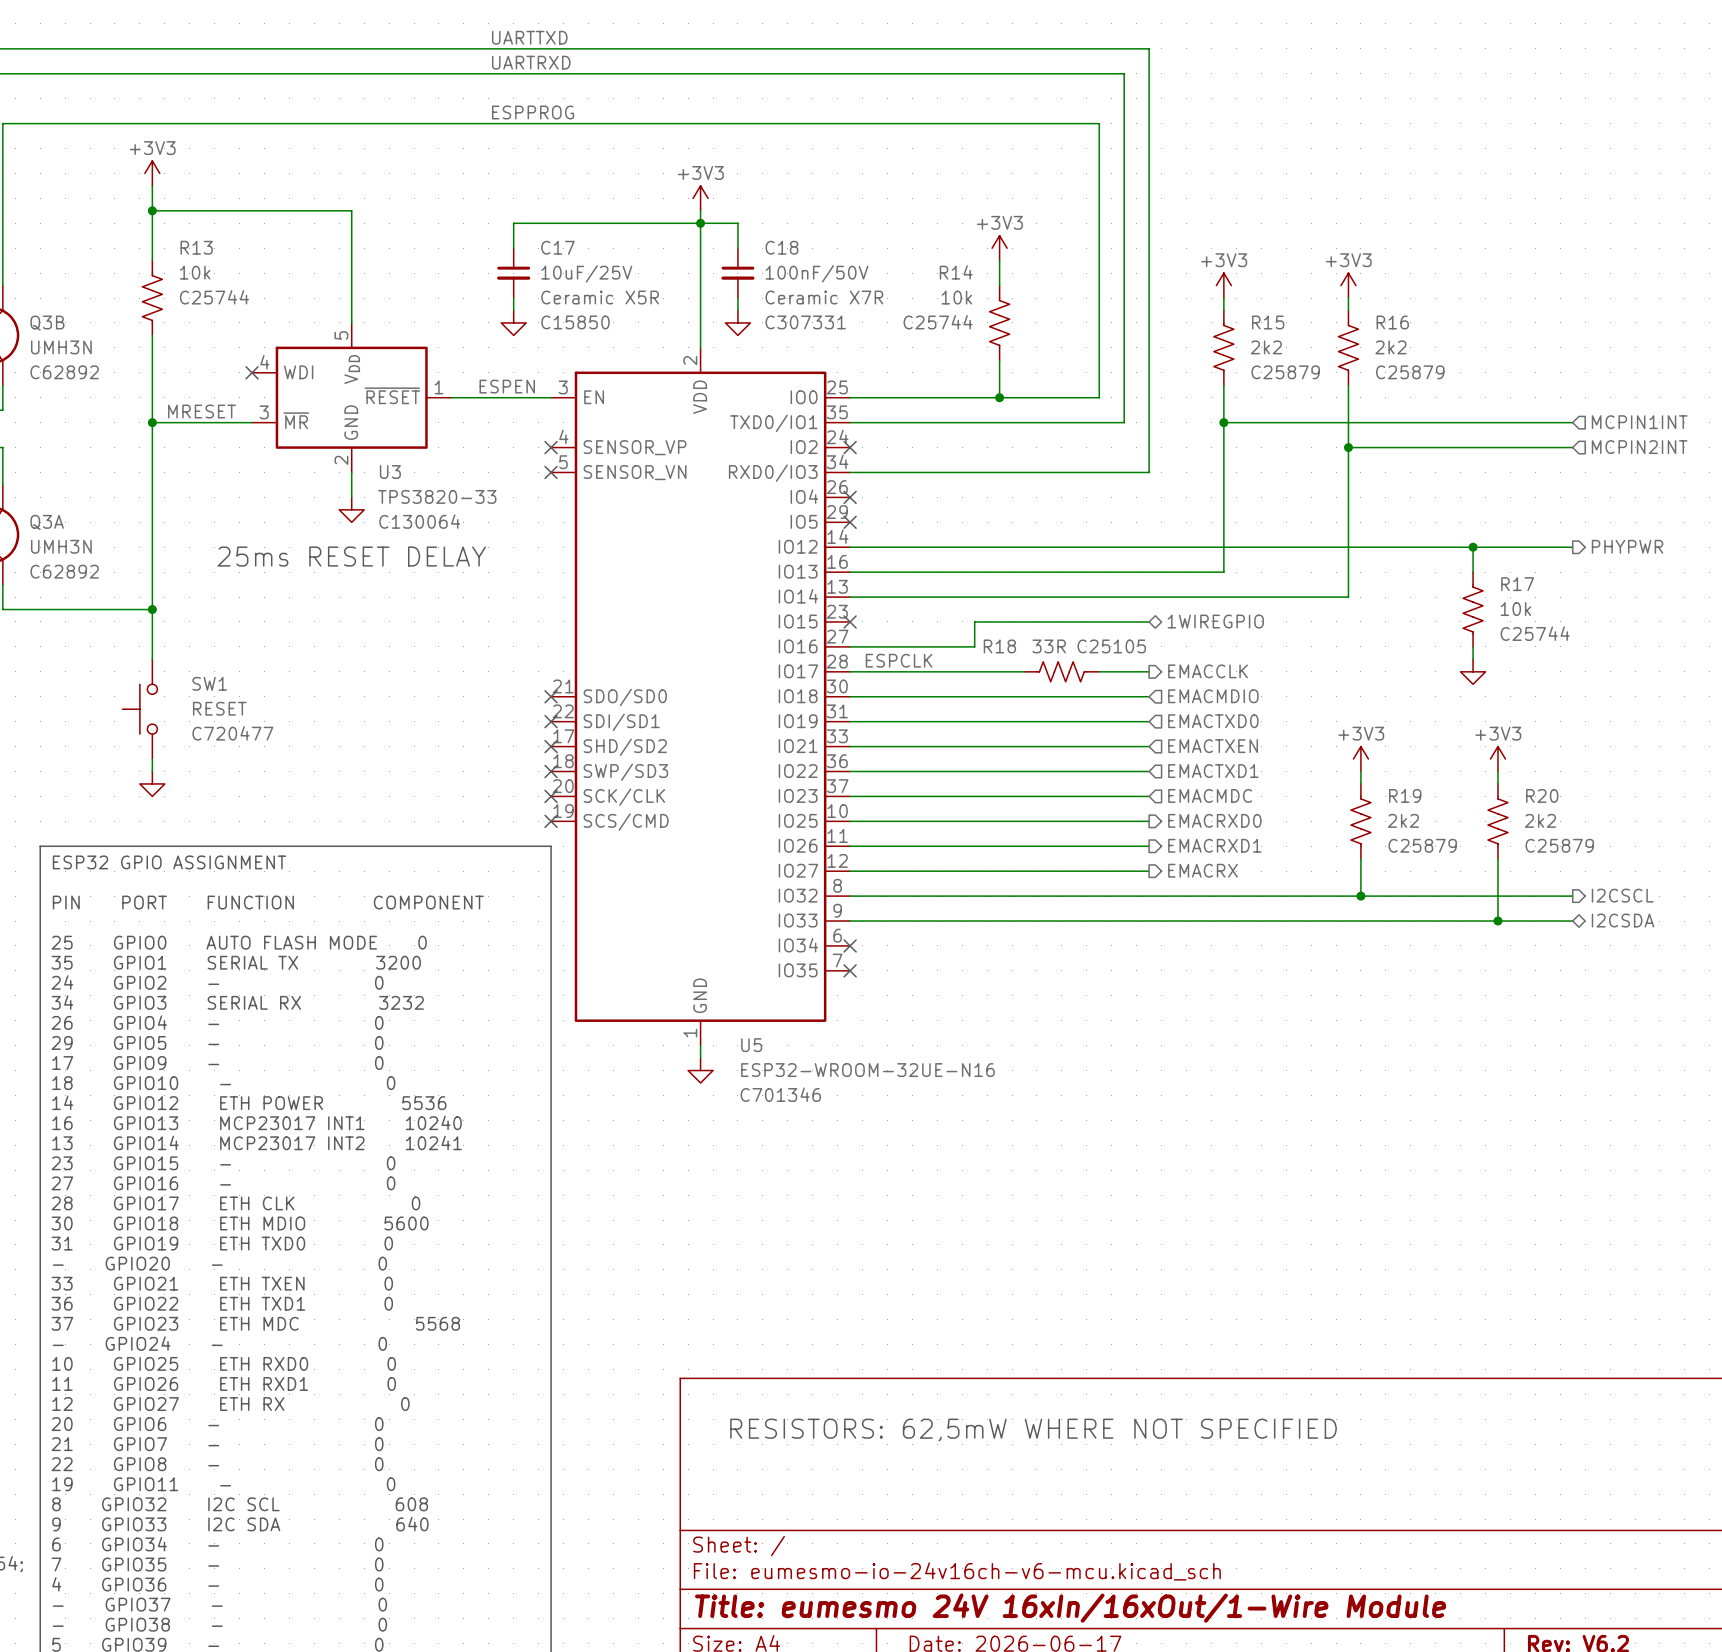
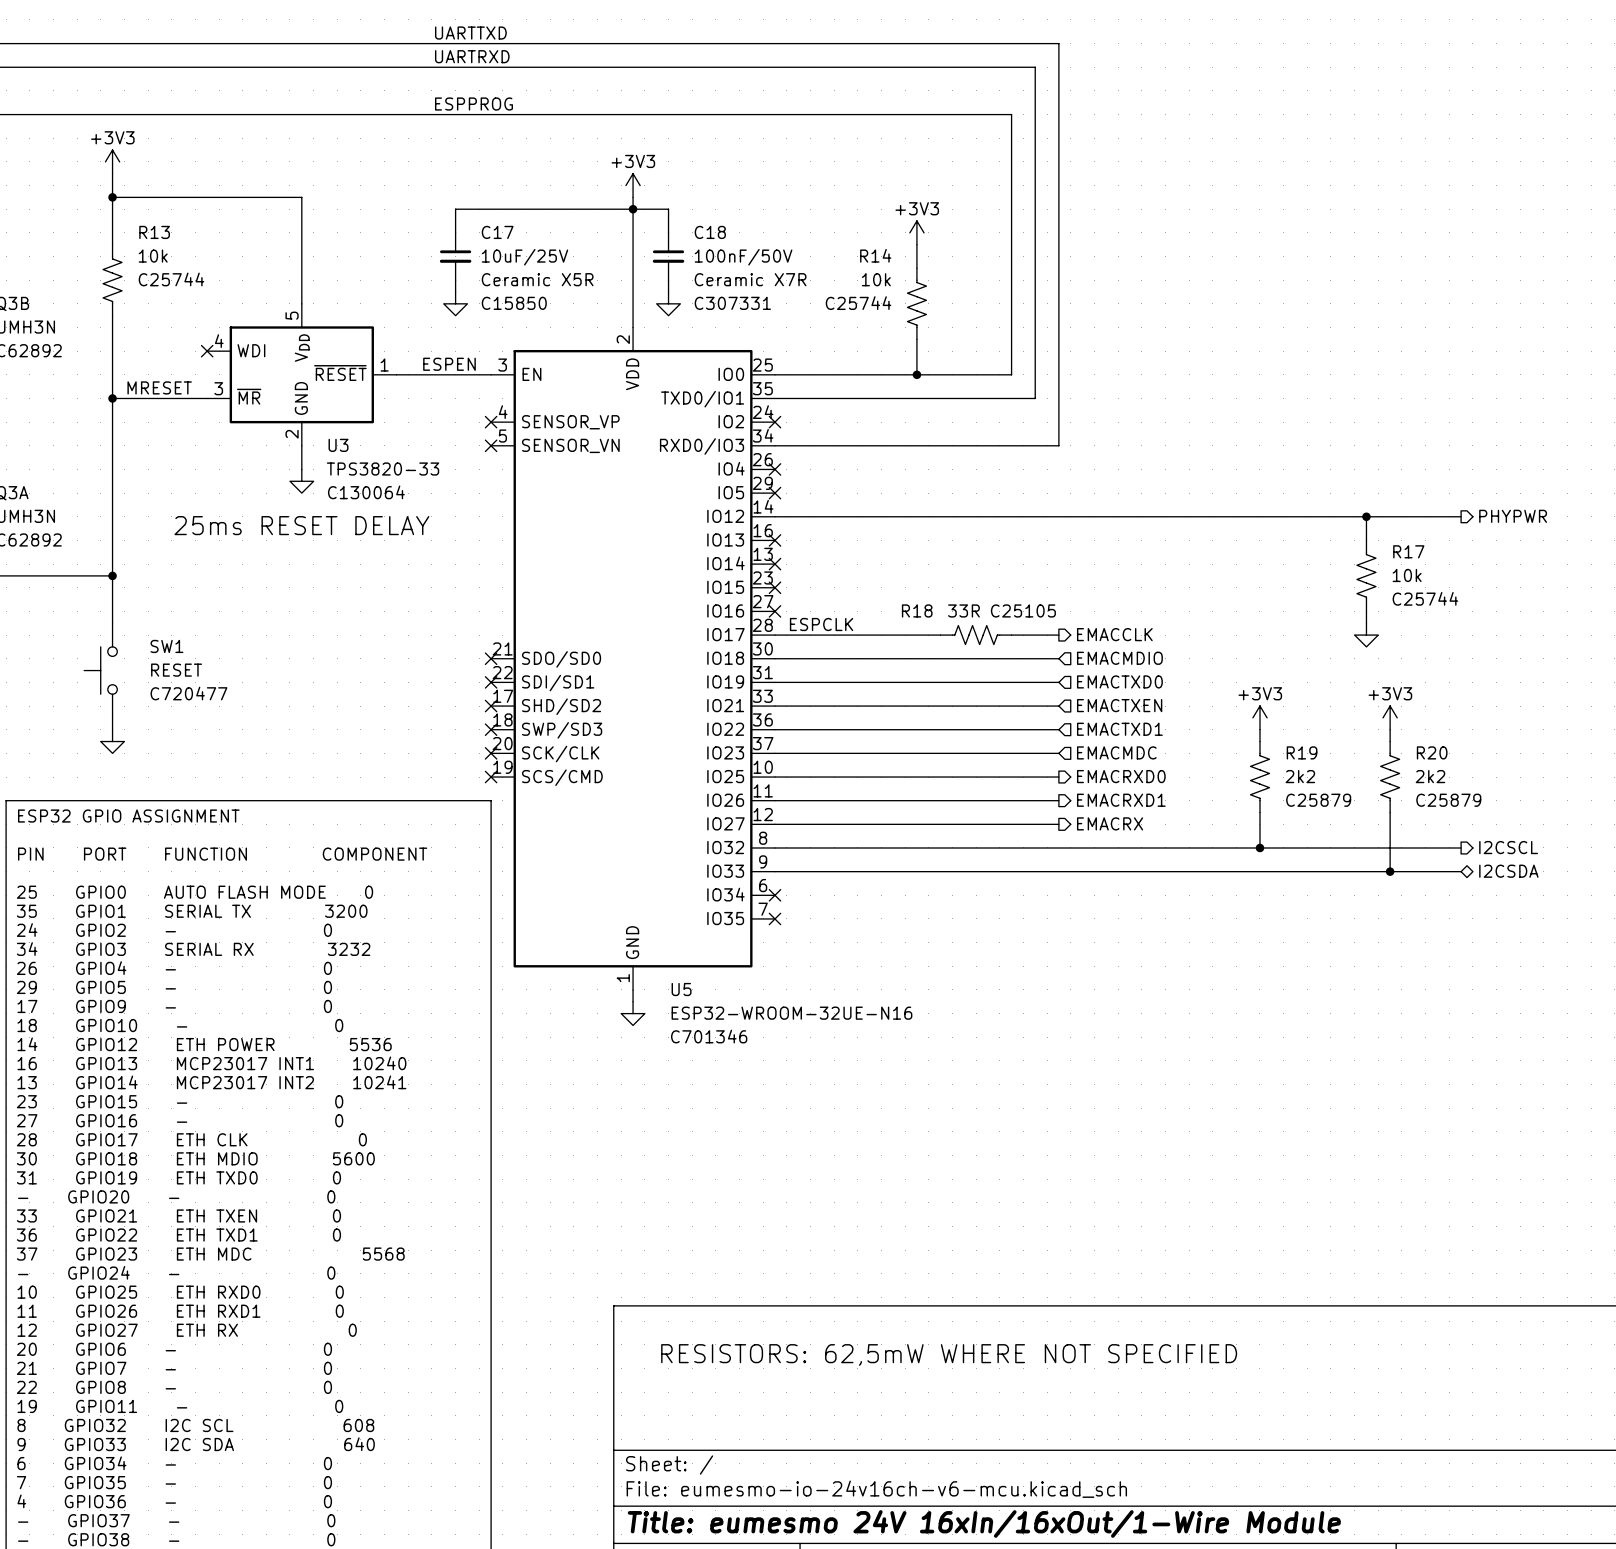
power symbol: +3V3 (1223, 285) -> none
power symbol: +3V3 (1348, 285) -> none
wire: (1223, 298) (1223, 310) -> none
wire: (1348, 298) (1348, 310) -> none
R15: 2k2 (1223, 347) -> none
R16: 2k2 (1348, 347) -> none
wire: (1223, 385) (1223, 572) (850, 572) -> none
wire: (1348, 385) (1348, 597) (850, 597) -> none
wire: (1223, 422) (1572, 422) -> none
junction: (1223, 422) -> none
hierarchical label: MCPIN1INT (1639, 422) -> none
wire: (1348, 447) (1572, 447) -> none
junction: (1348, 447) -> none
hierarchical label: MCPIN2INT (1639, 447) -> none
no-connect mark: none -> (774, 540)
no-connect mark: none -> (774, 564)
wire: (1149, 621) (974, 621) (974, 646) (850, 646) -> none
hierarchical label: 1WIREGPIO (1215, 621) -> none
no-connect mark: none -> (774, 611)

